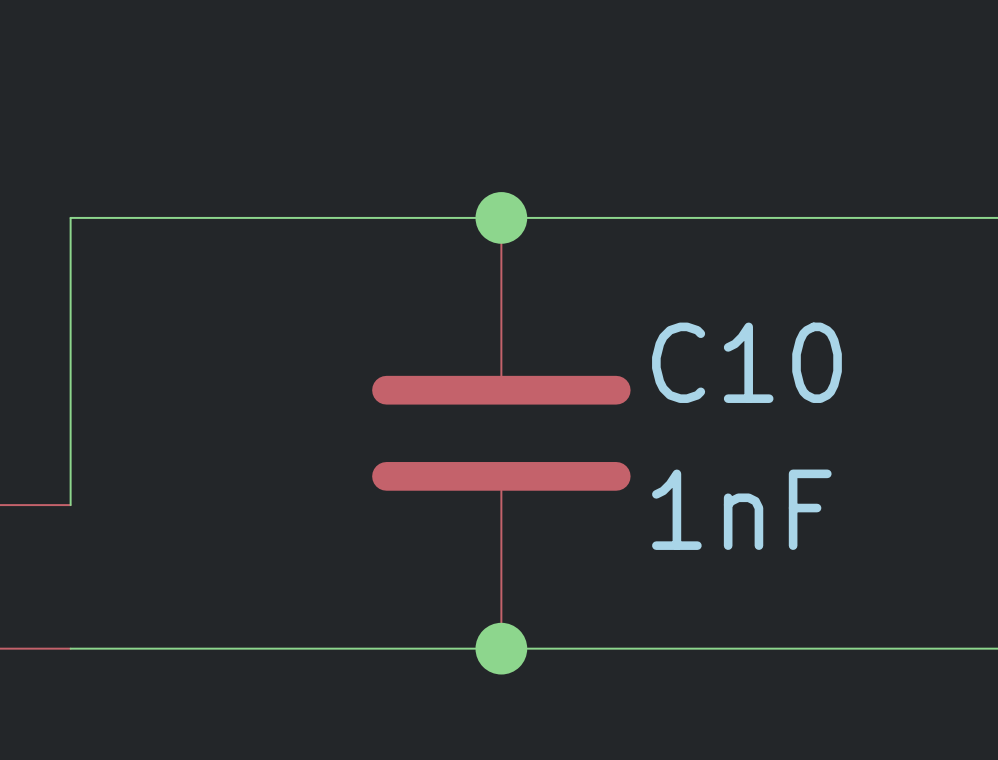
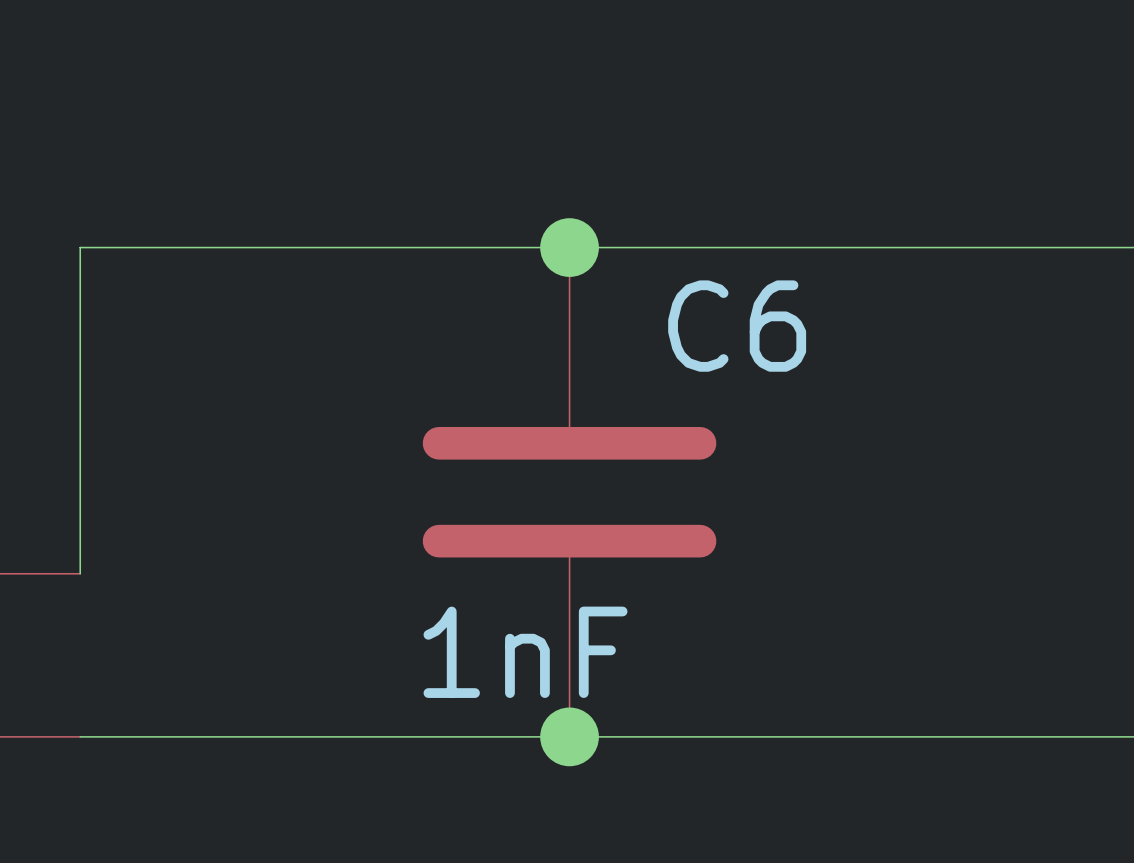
C10 name: C10 (746, 362) -> C6 (737, 326)
C10 value position: 1nF (741, 509) -> 1nF (525, 652)

